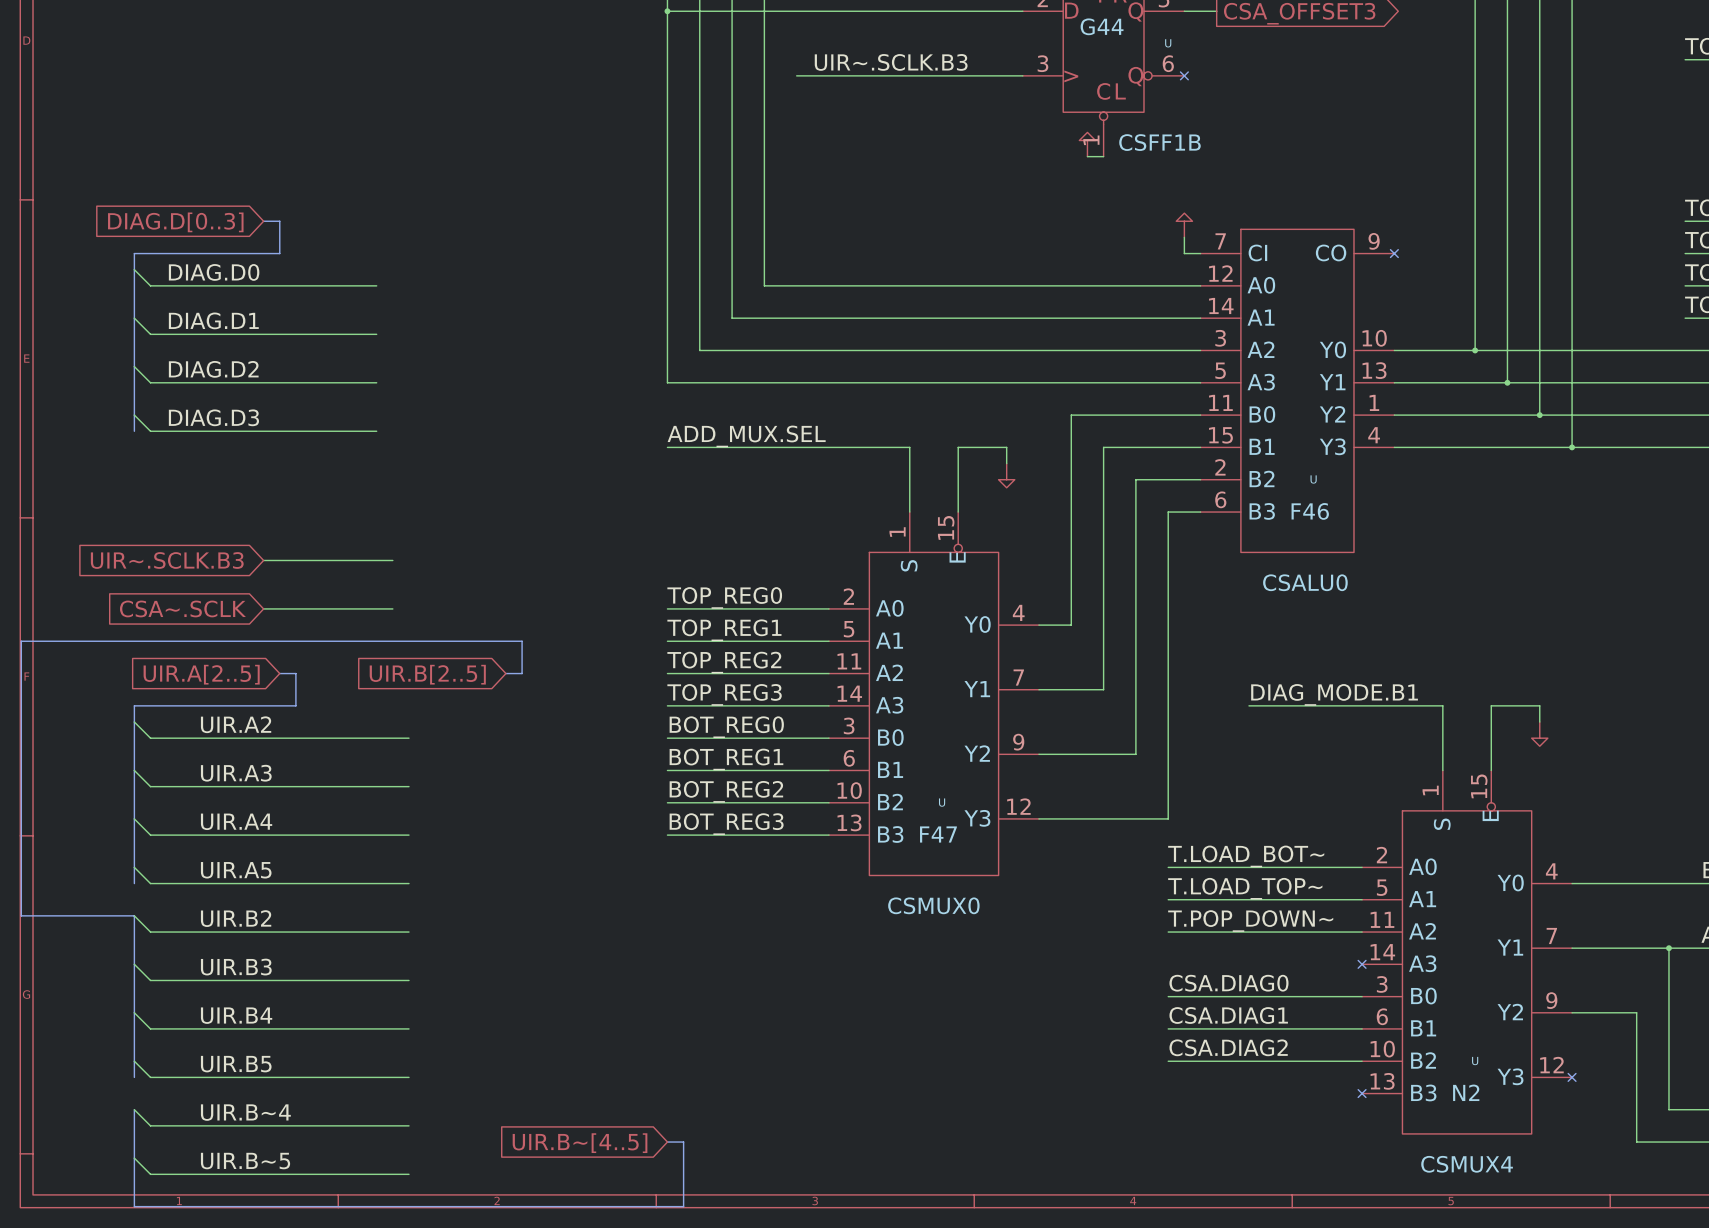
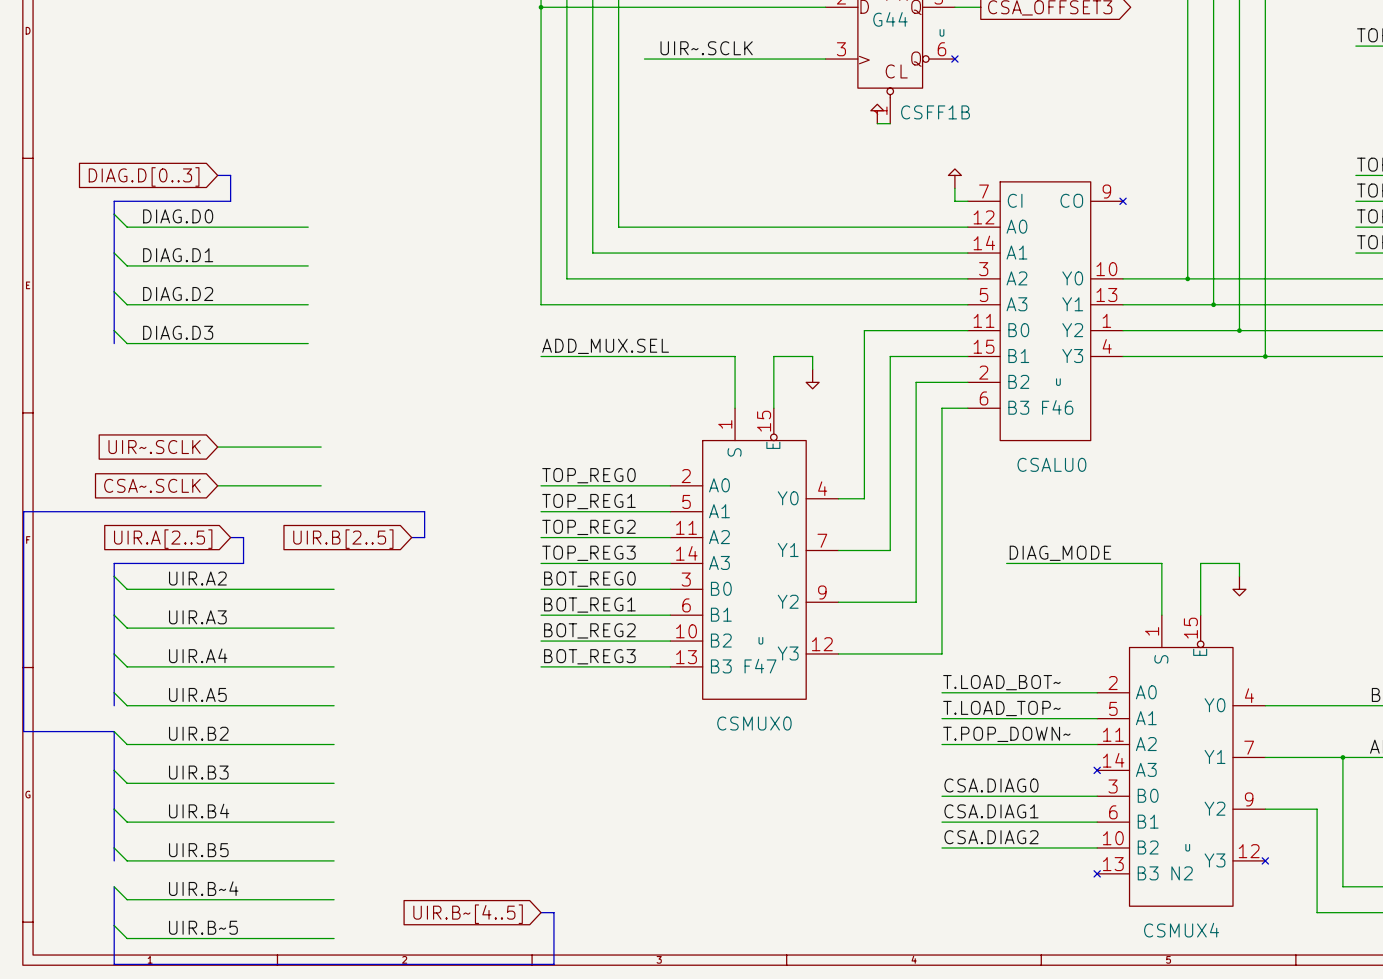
label: UIR~.SCLK.B3 (891, 62) -> UIR~.SCLK (706, 48)
global label: UIR~.SCLK.B3 (167, 560) -> UIR~.SCLK (154, 447)
label: DIAG_MODE.B1 (1334, 694) -> DIAG_MODE (1060, 553)

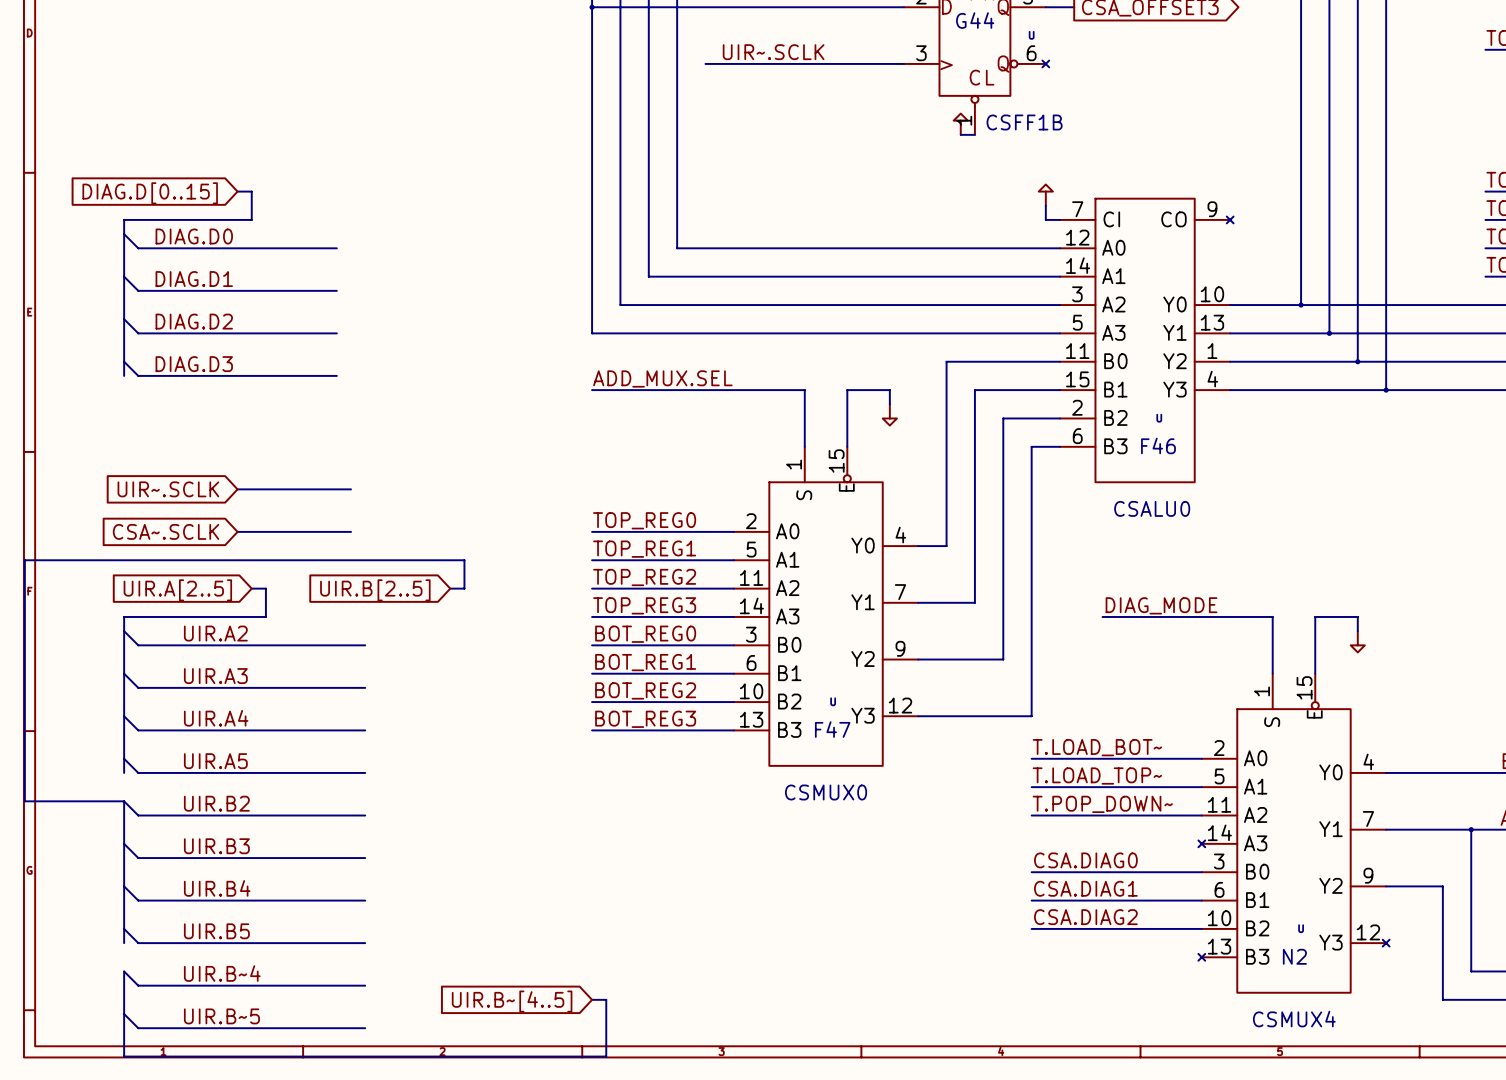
global label: DIAG.D[0..3] (144, 176) -> DIAG.D[0..15] (150, 193)

